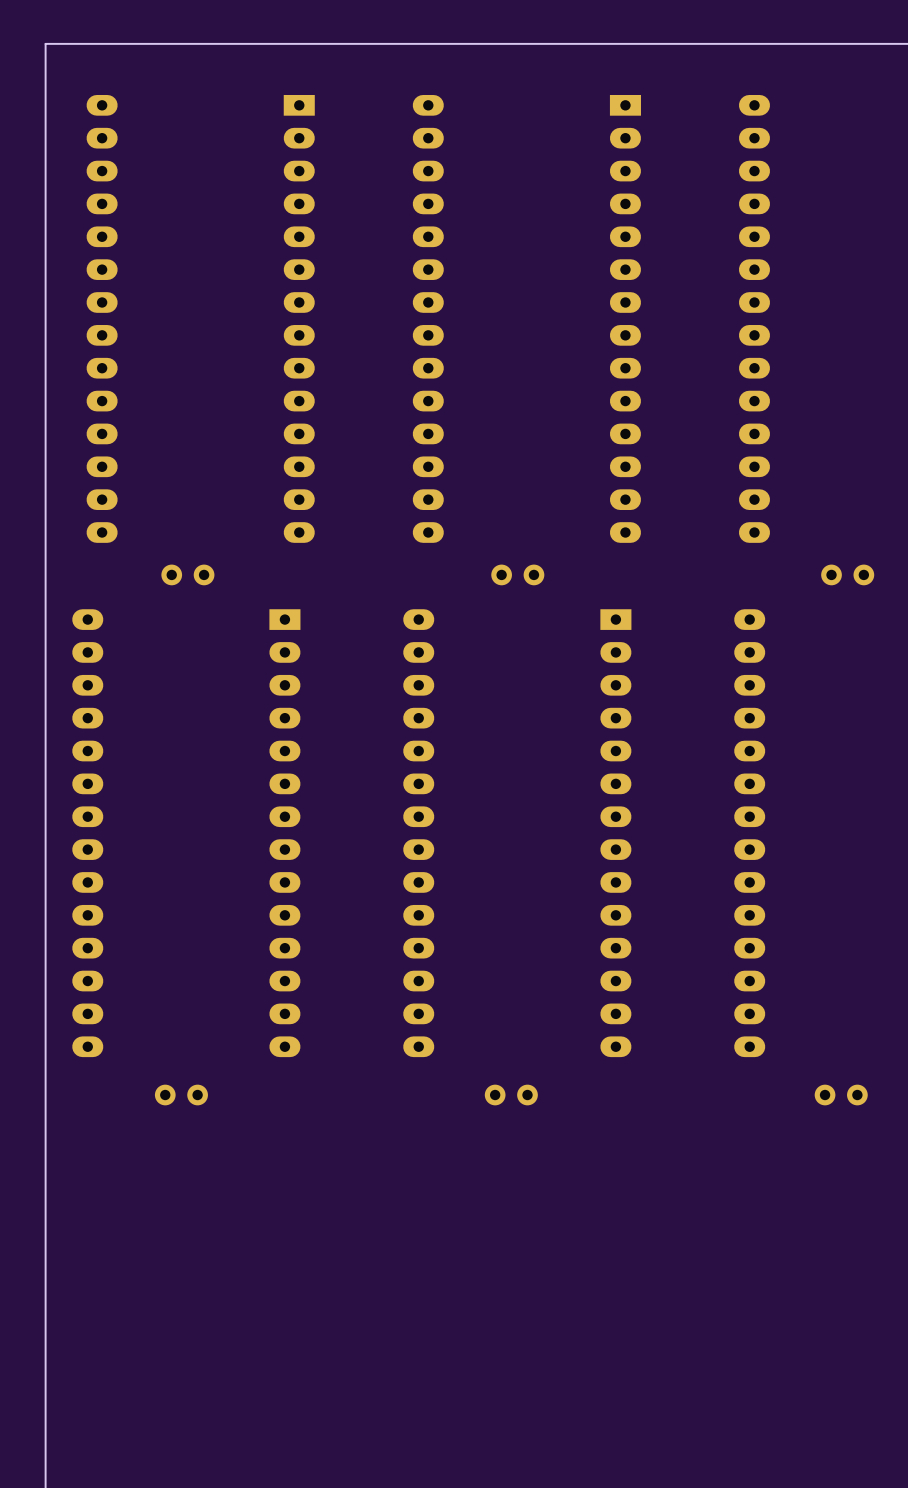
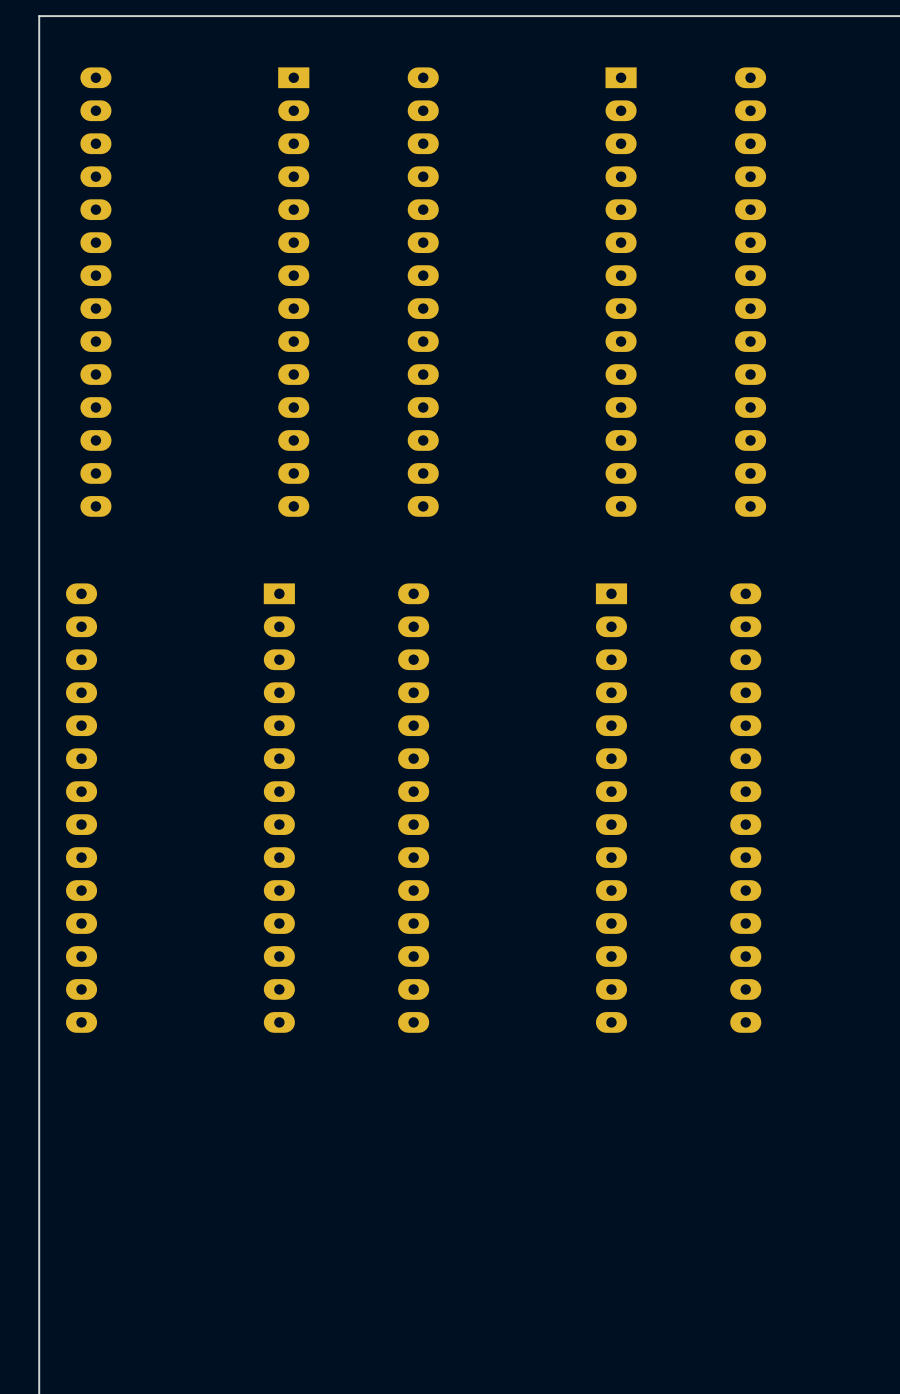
part: (187, 574) -> none
part: (517, 574) -> none
part: (847, 574) -> none
part: (181, 1095) -> none
part: (511, 1095) -> none
part: (841, 1095) -> none

